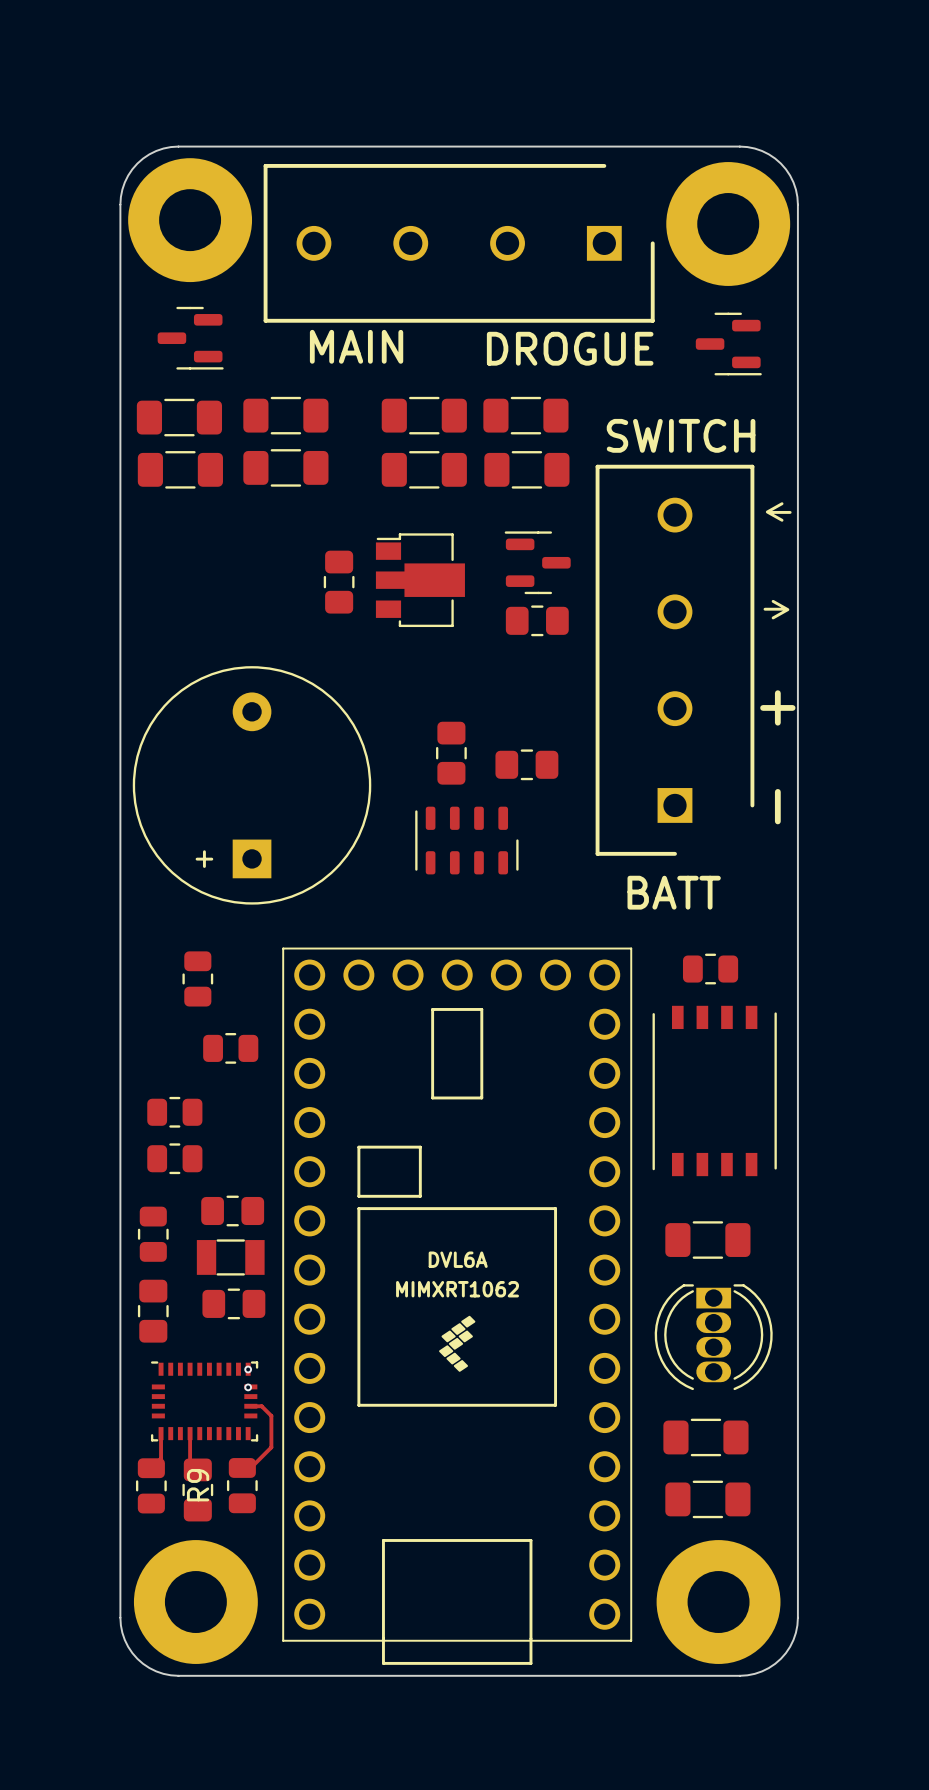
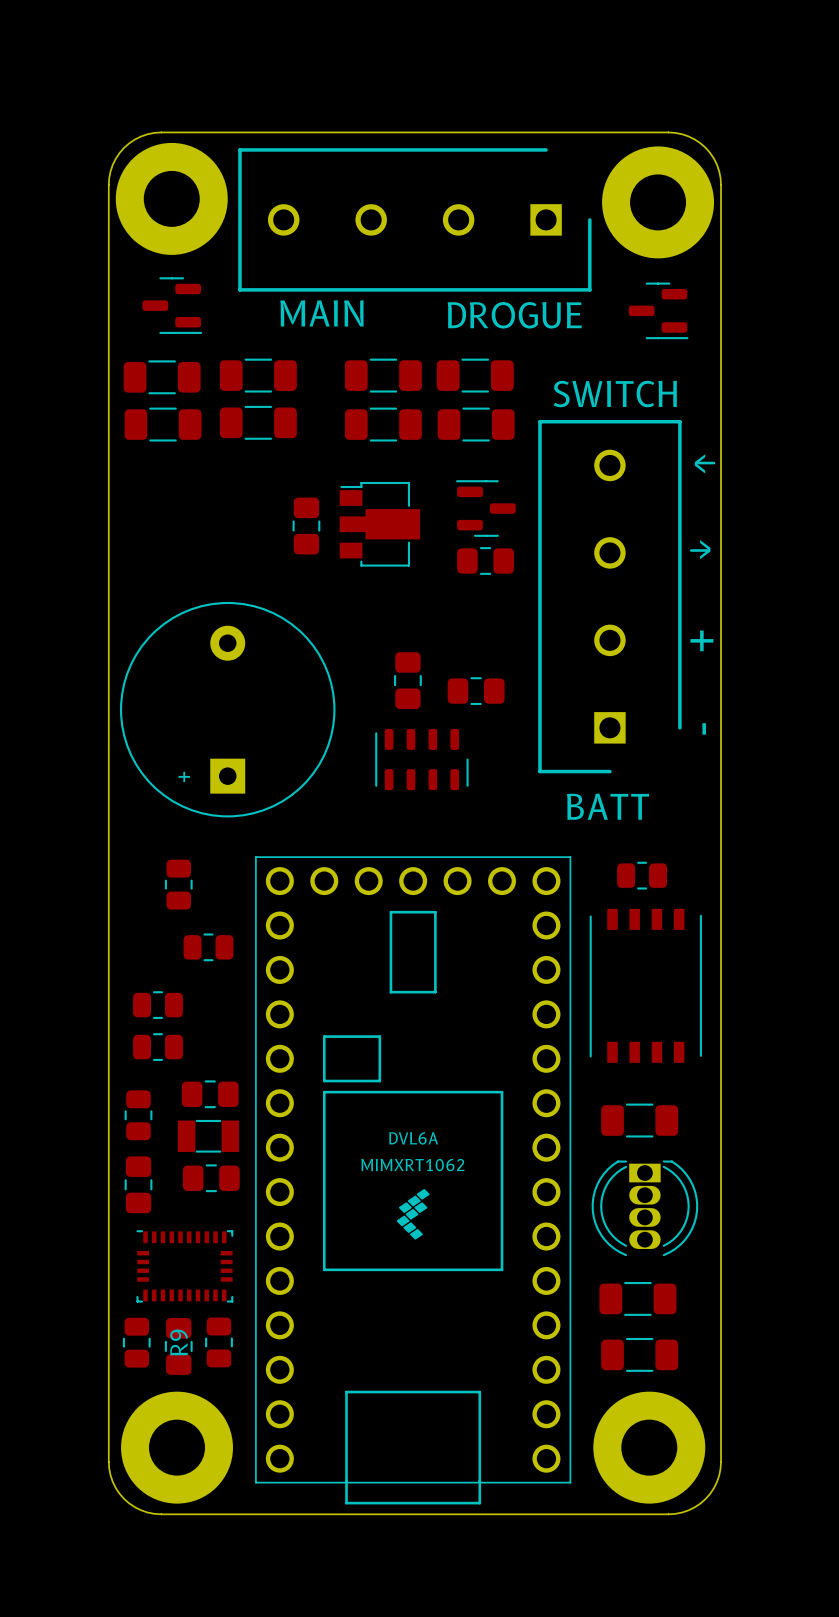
via: (248, 1369) -> none
via: (248, 1387) -> none
top track: (250, 1406) (261, 1406) (271, 1415) (271, 1447) (250, 1467) (242, 1467) -> none
top track: (161, 1433) (161, 1458) (151, 1468) -> none
top track: (190, 1433) (190, 1462) (197, 1469) -> none

